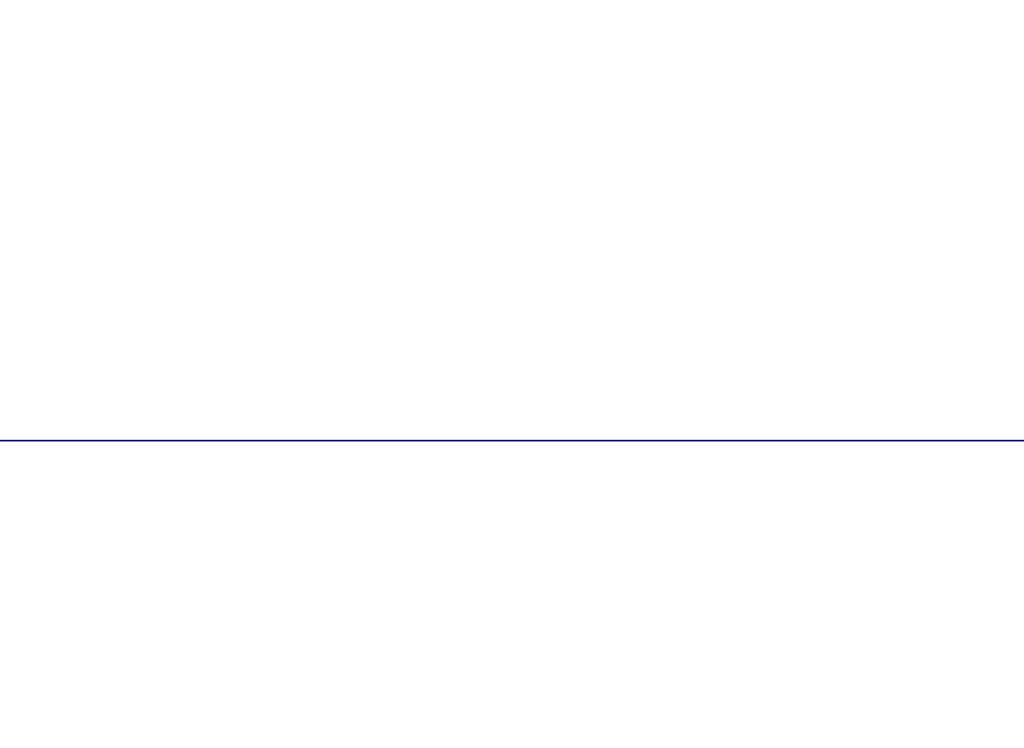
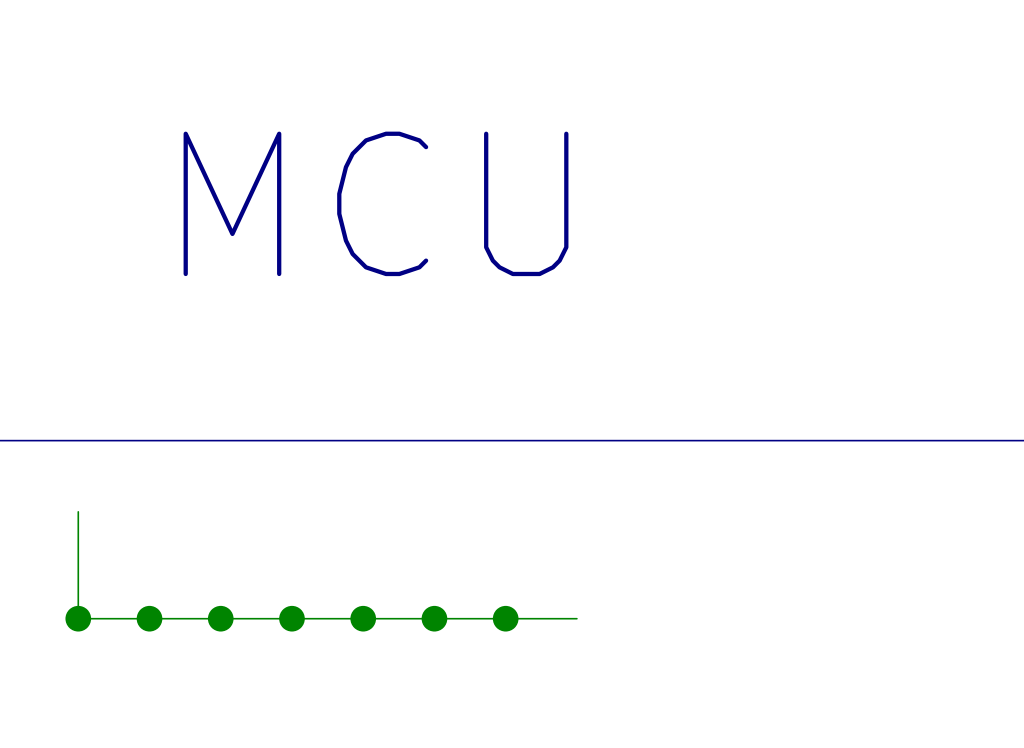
text: none -> MCU (376, 203)
wire: none -> (78, 511) (78, 618) (576, 618)
junction: none -> (78, 618)
junction: none -> (149, 618)
junction: none -> (220, 618)
junction: none -> (291, 618)
junction: none -> (363, 618)
junction: none -> (434, 618)
junction: none -> (505, 618)

